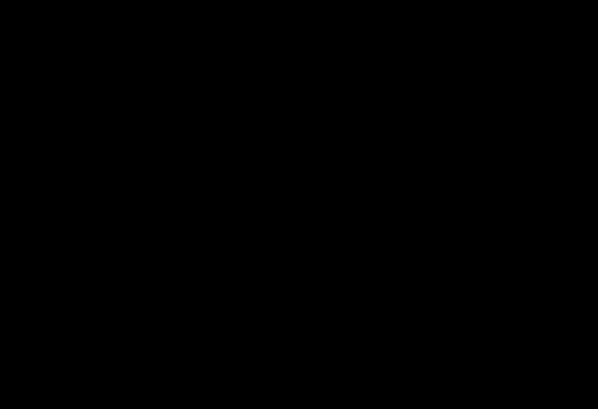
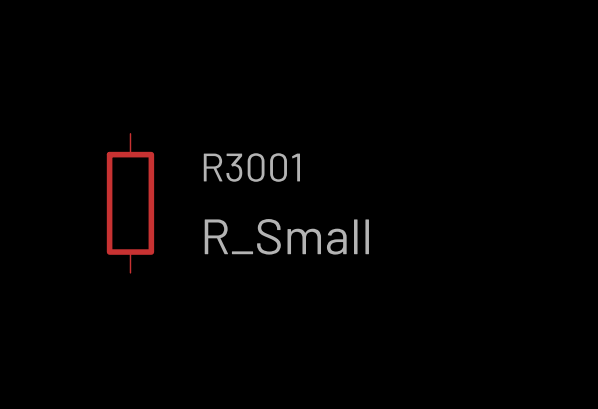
R3001: none -> R_Small (130, 203)

